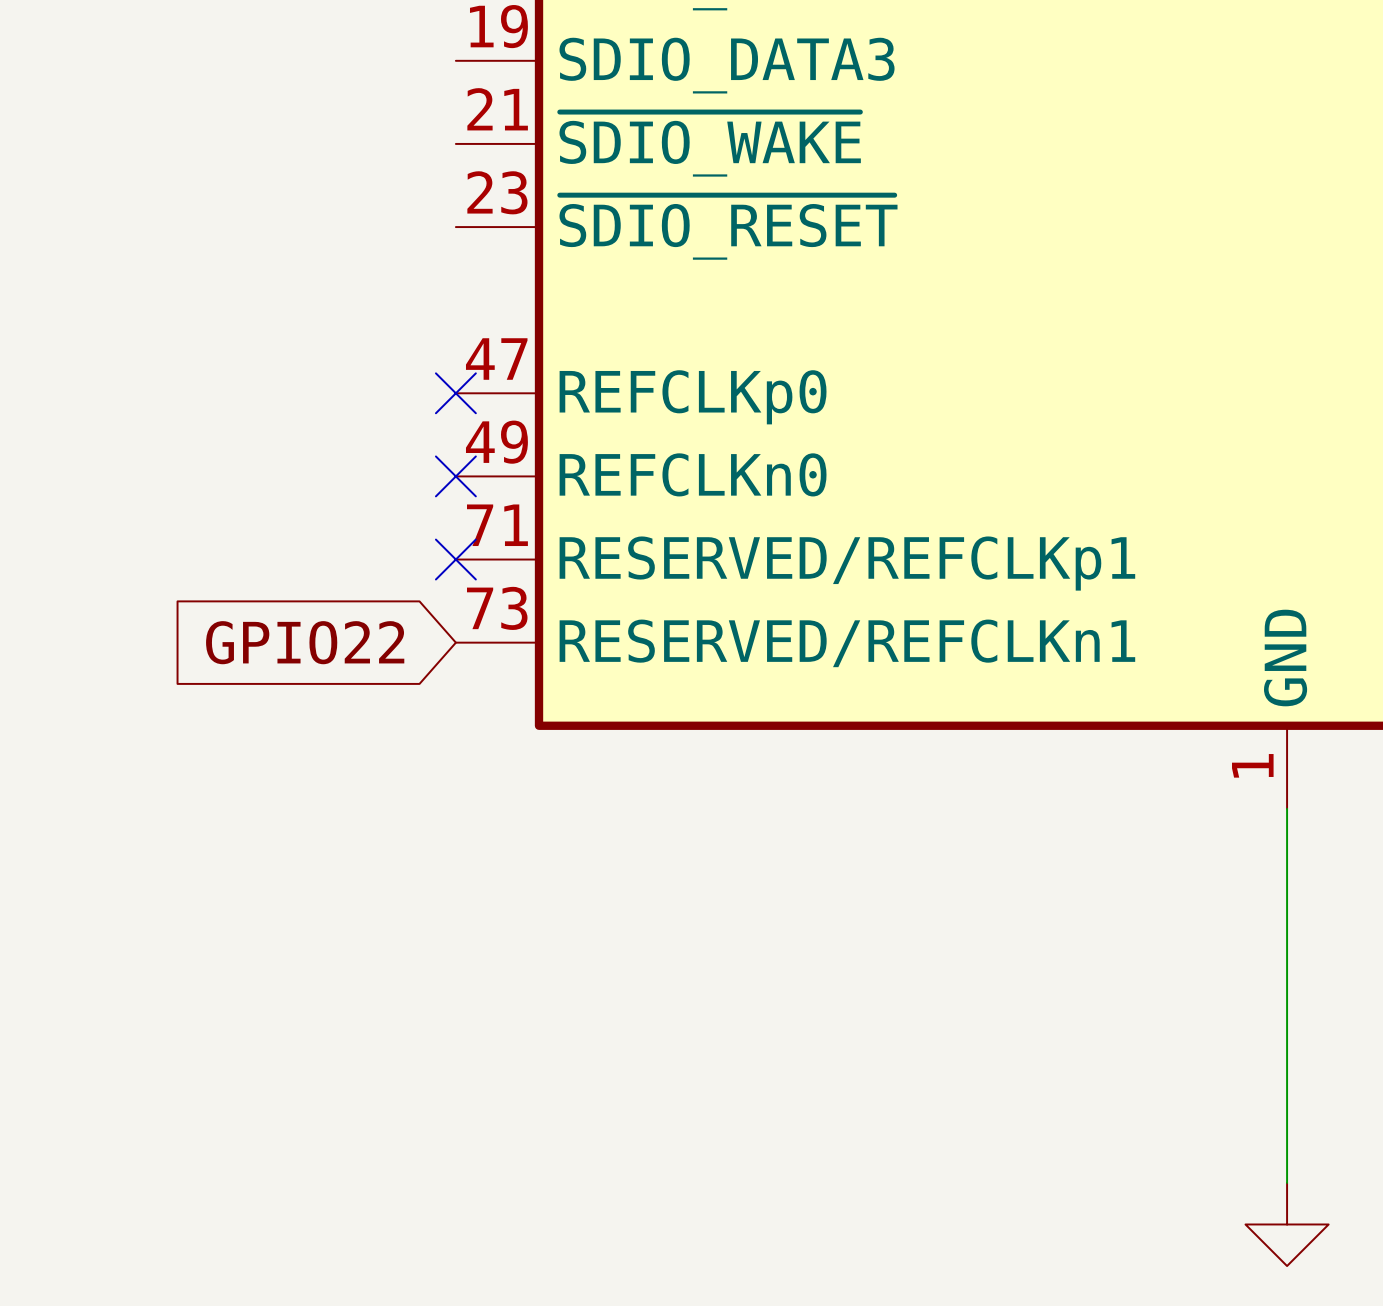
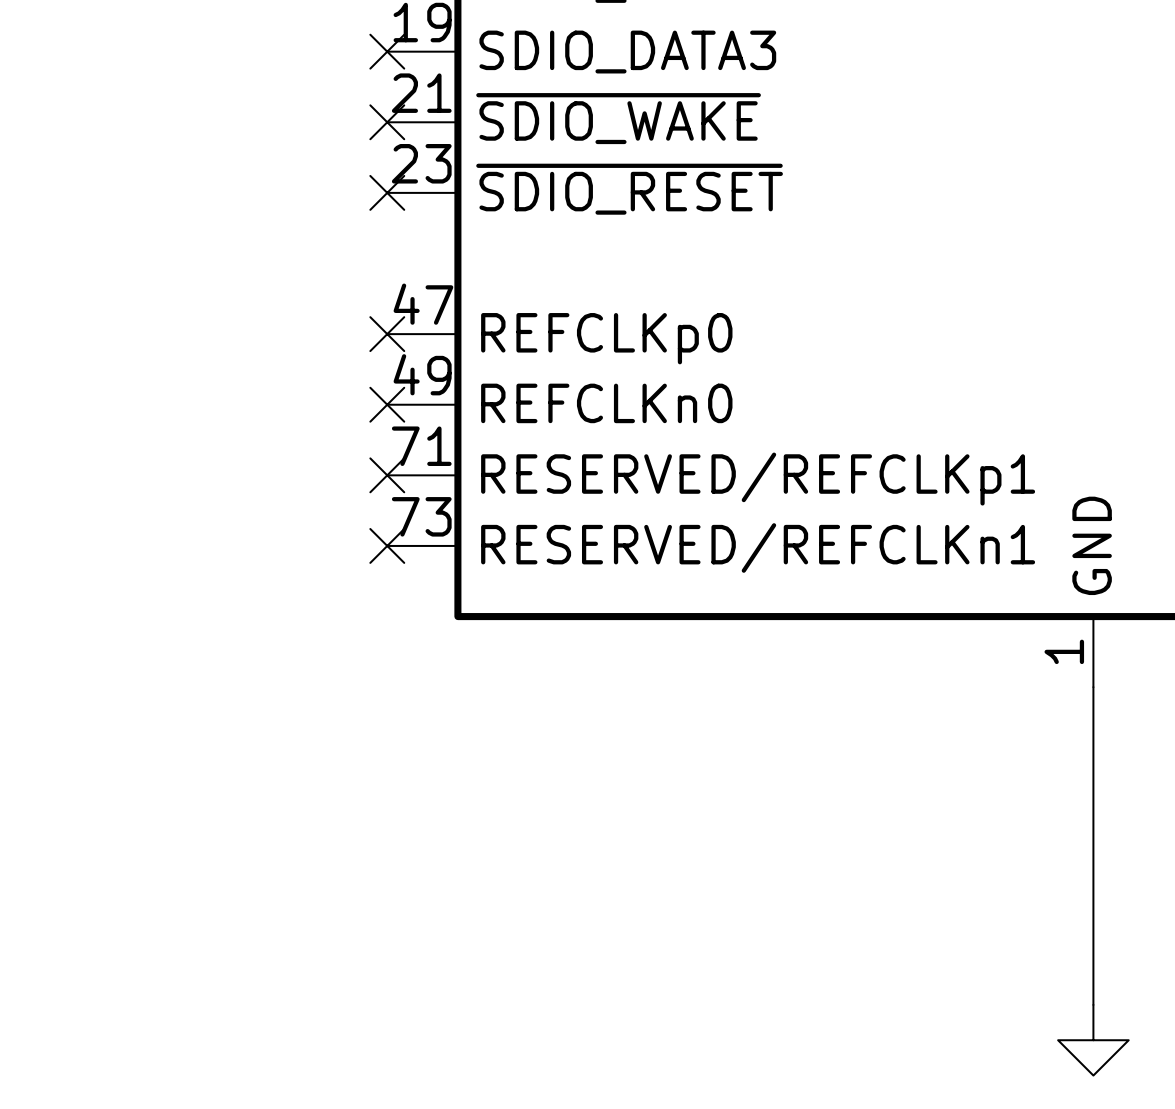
no-connect mark: none -> (387, 51)
no-connect mark: none -> (387, 122)
no-connect mark: none -> (387, 192)
global label: GPIO22 (305, 642) -> none
no-connect mark: none -> (387, 545)

